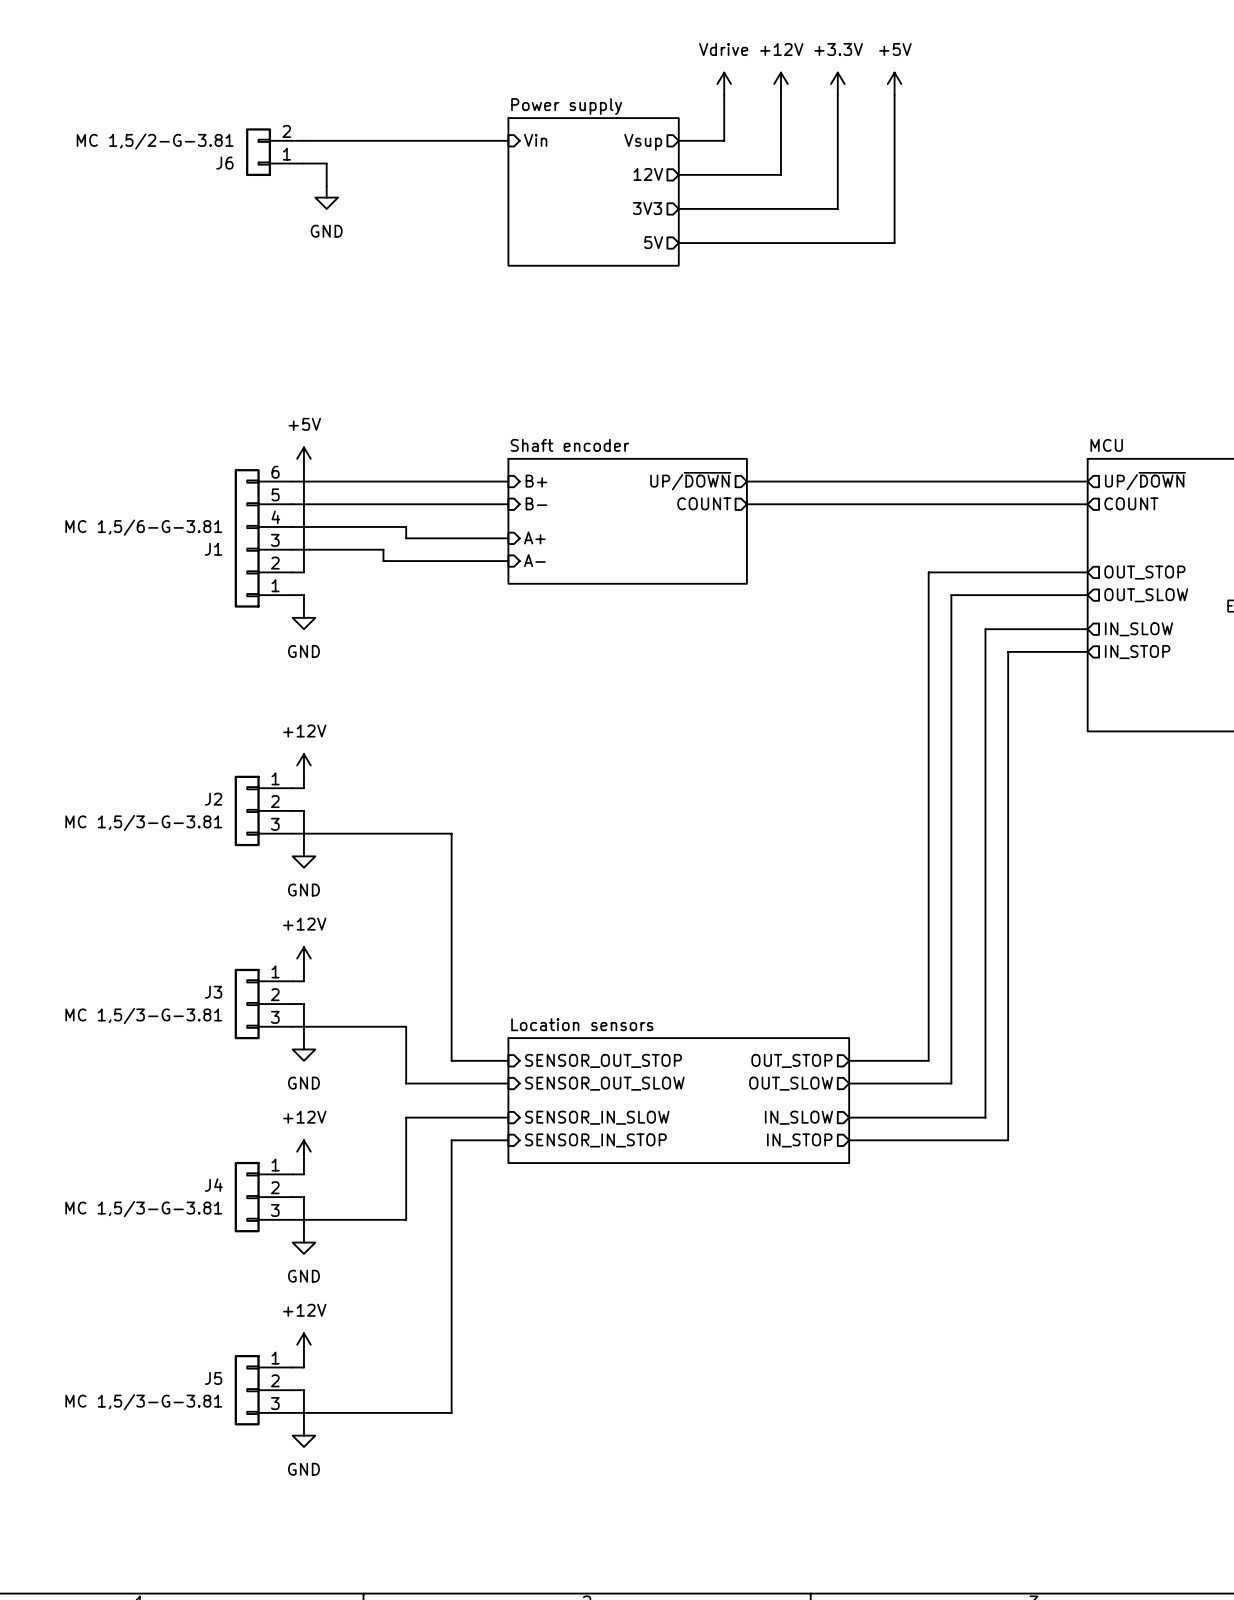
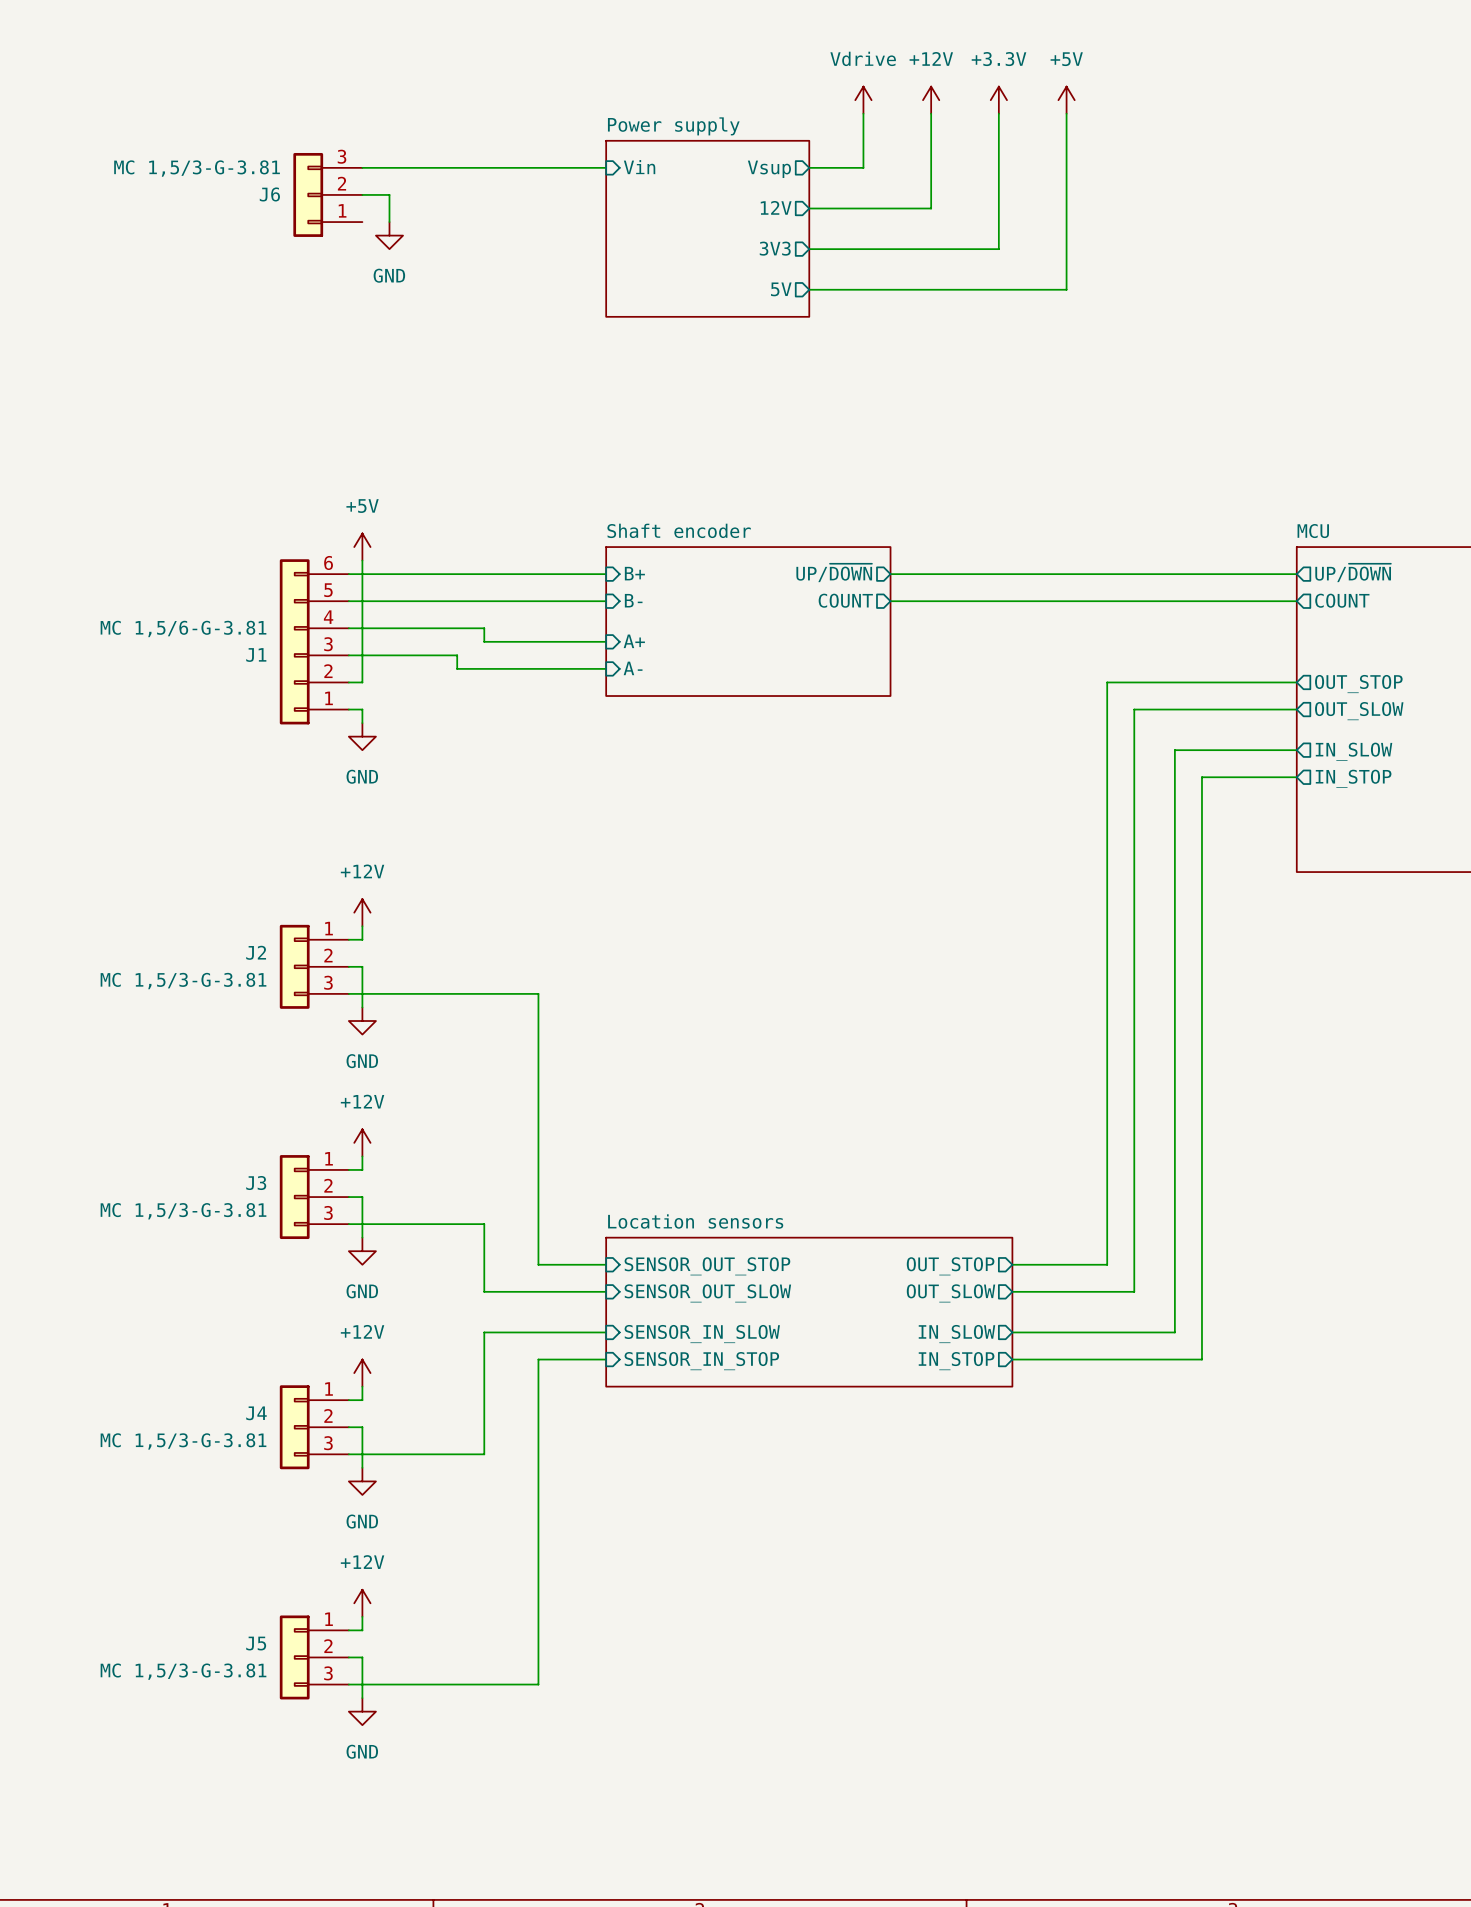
J6 symbol: [246, 128, 304, 177] -> [293, 152, 363, 237]
J6 value: MC 1,5/2-G-3.81 (155, 141) -> MC 1,5/3-G-3.81 (197, 168)

